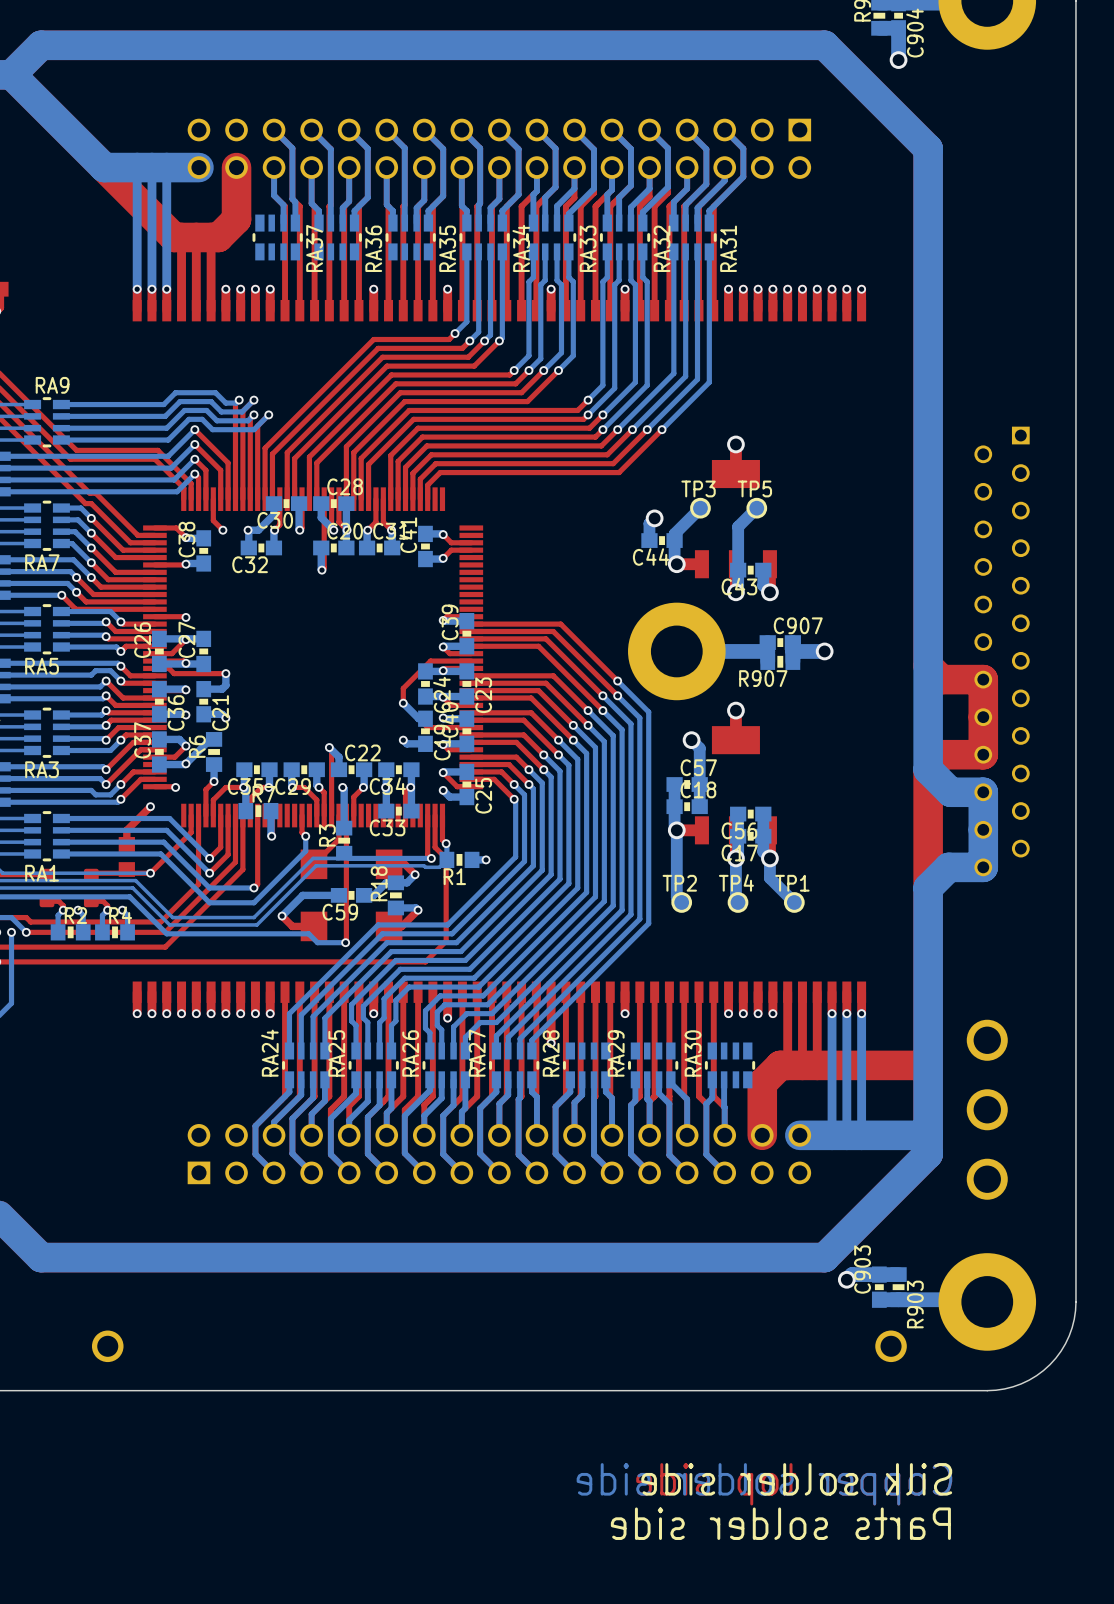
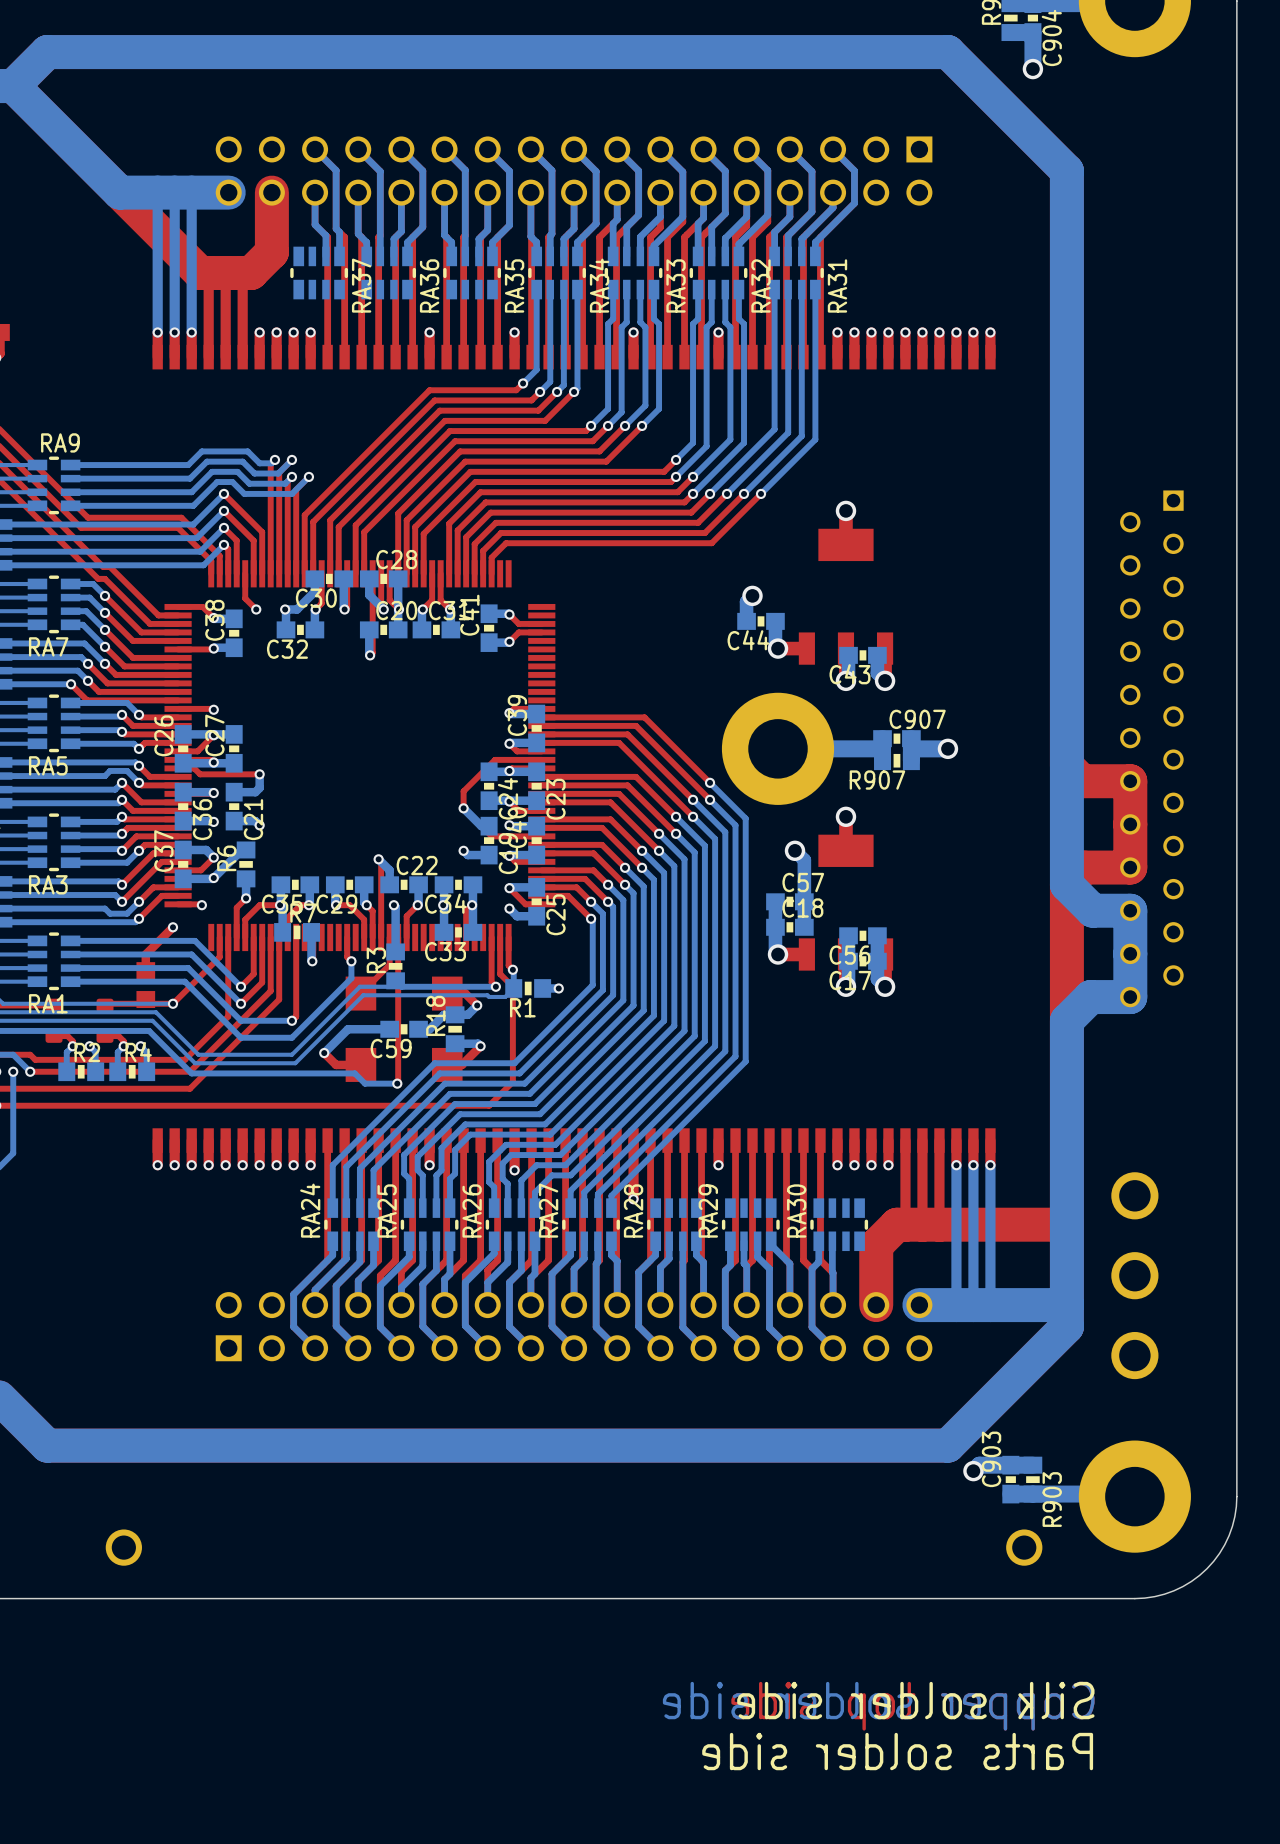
bottom track: (700, 508) (674, 534) (674, 540) -> none
TP3: (700, 508) -> none
bottom track: (756, 508) (738, 526) (738, 570) -> none
TP5: (756, 508) -> none
bottom track: (676, 830) (676, 897) (681, 902) -> none
bottom track: (735, 858) (735, 900) (738, 902) -> none
bottom track: (769, 858) (769, 878) (794, 902) -> none
TP2: (681, 902) -> none
TP4: (738, 902) -> none
TP1: (794, 902) -> none

